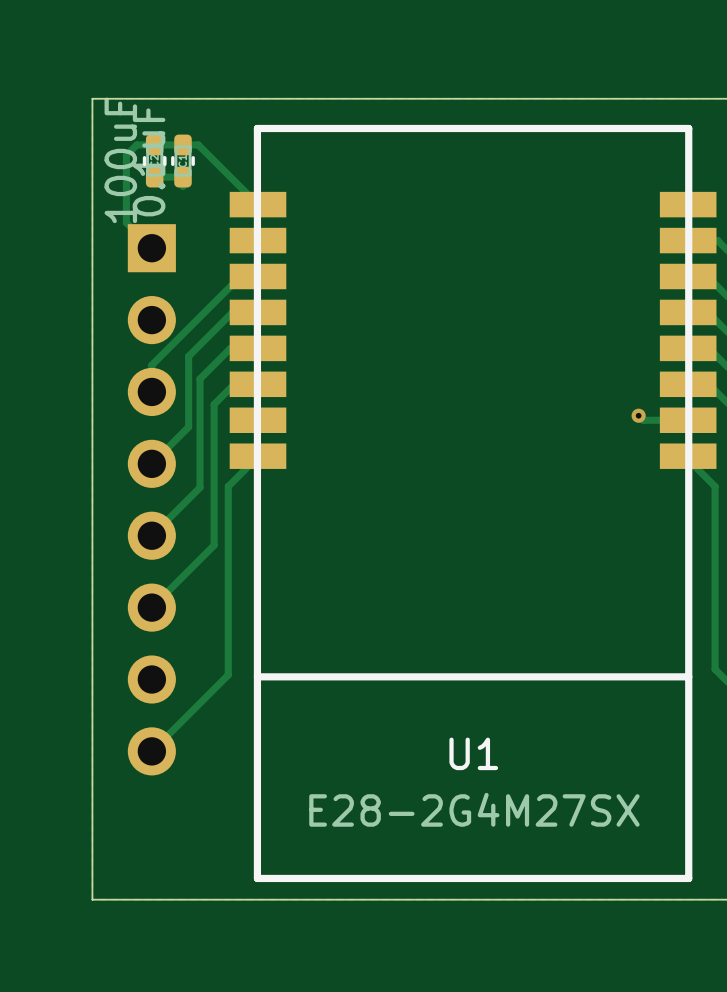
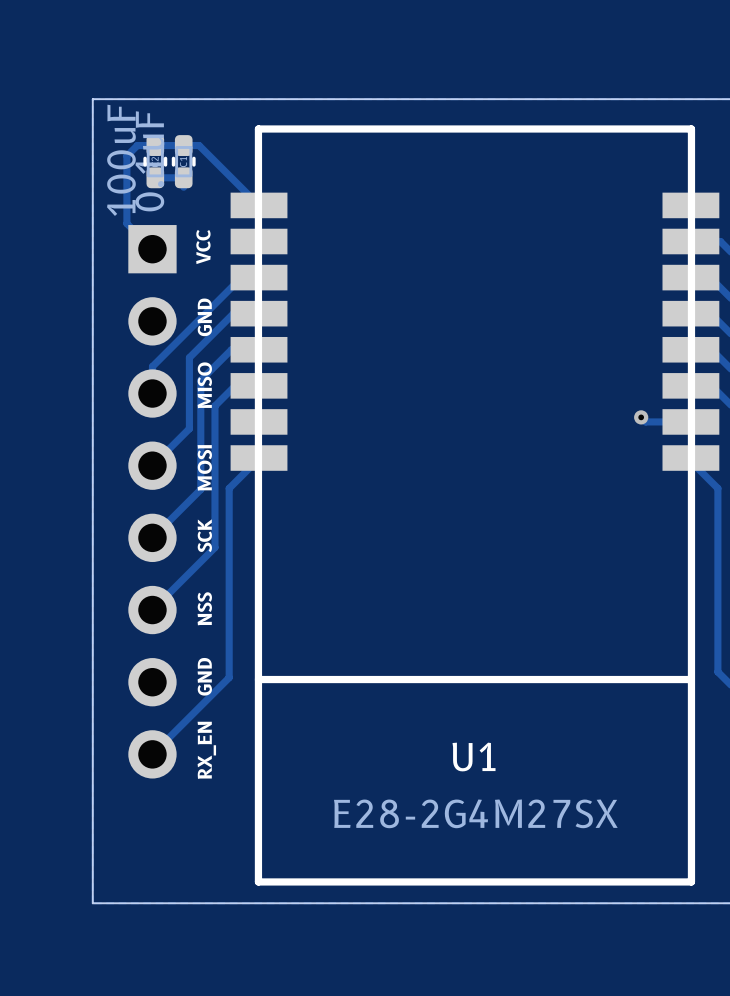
text: none -> VCC (203, 247)
text: none -> GND (204, 317)
text: none -> MISO (204, 385)
text: none -> MOSI (204, 467)
text: none -> SCK (204, 535)
text: none -> NSS (204, 608)
text: none -> GND (204, 676)
text: none -> RX_EN (206, 750)

